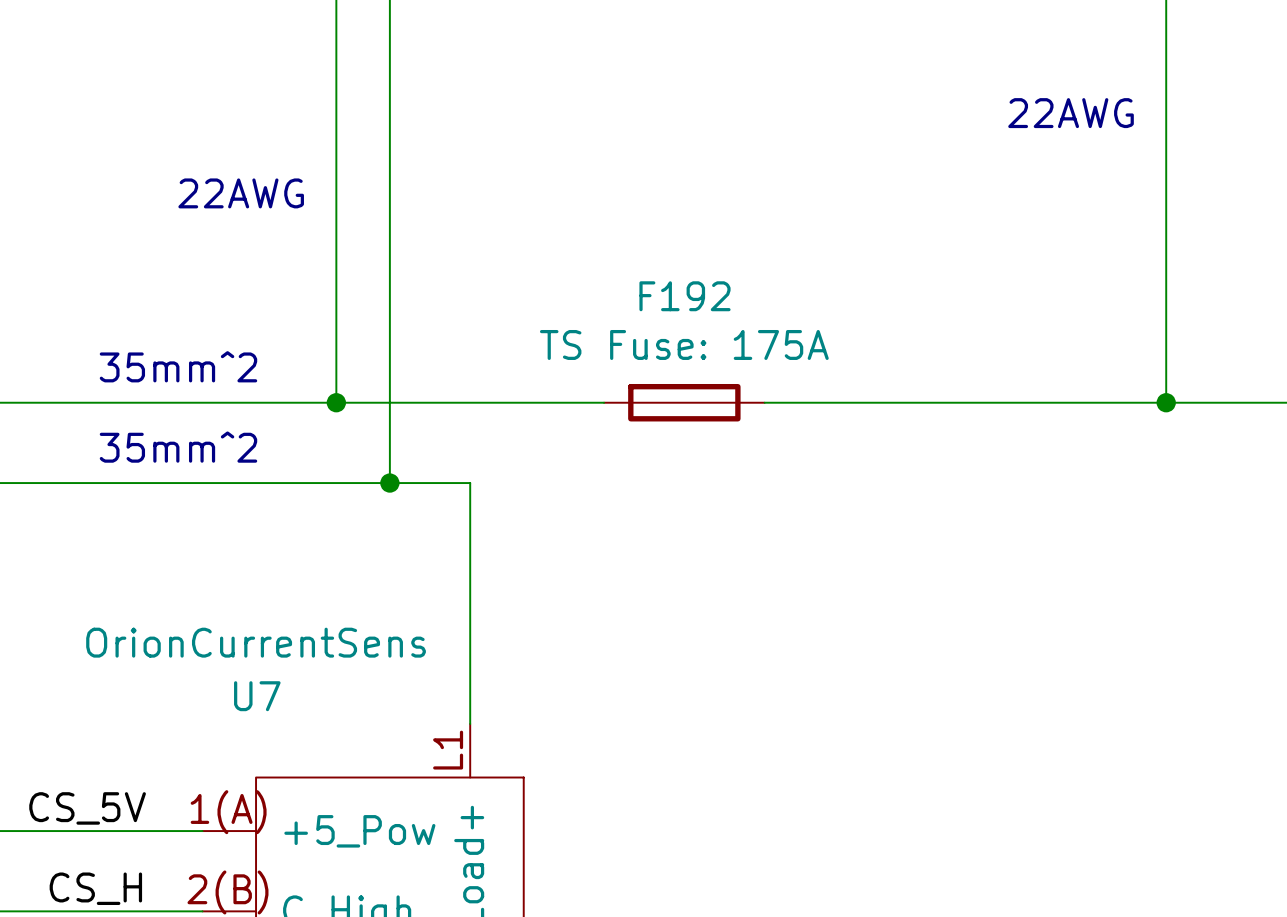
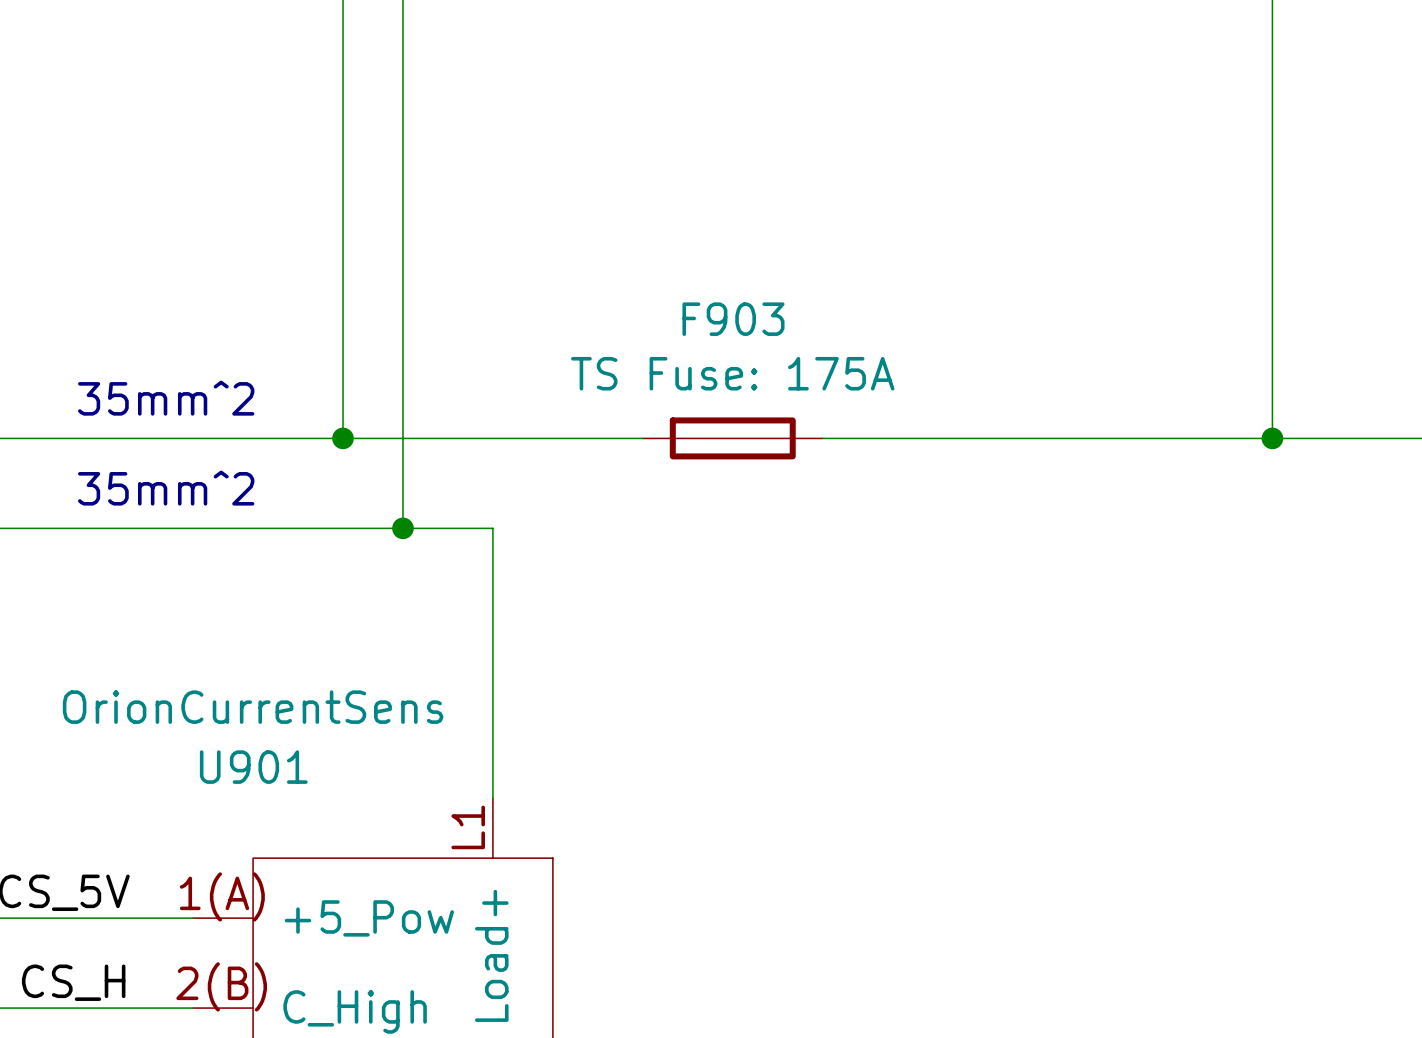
text: 22AWG (1071, 113) -> none
text: 22AWG (241, 193) -> none
F192 name: F192 (684, 296) -> F903 (733, 319)
U7 name: U7 (257, 696) -> U901 (253, 767)

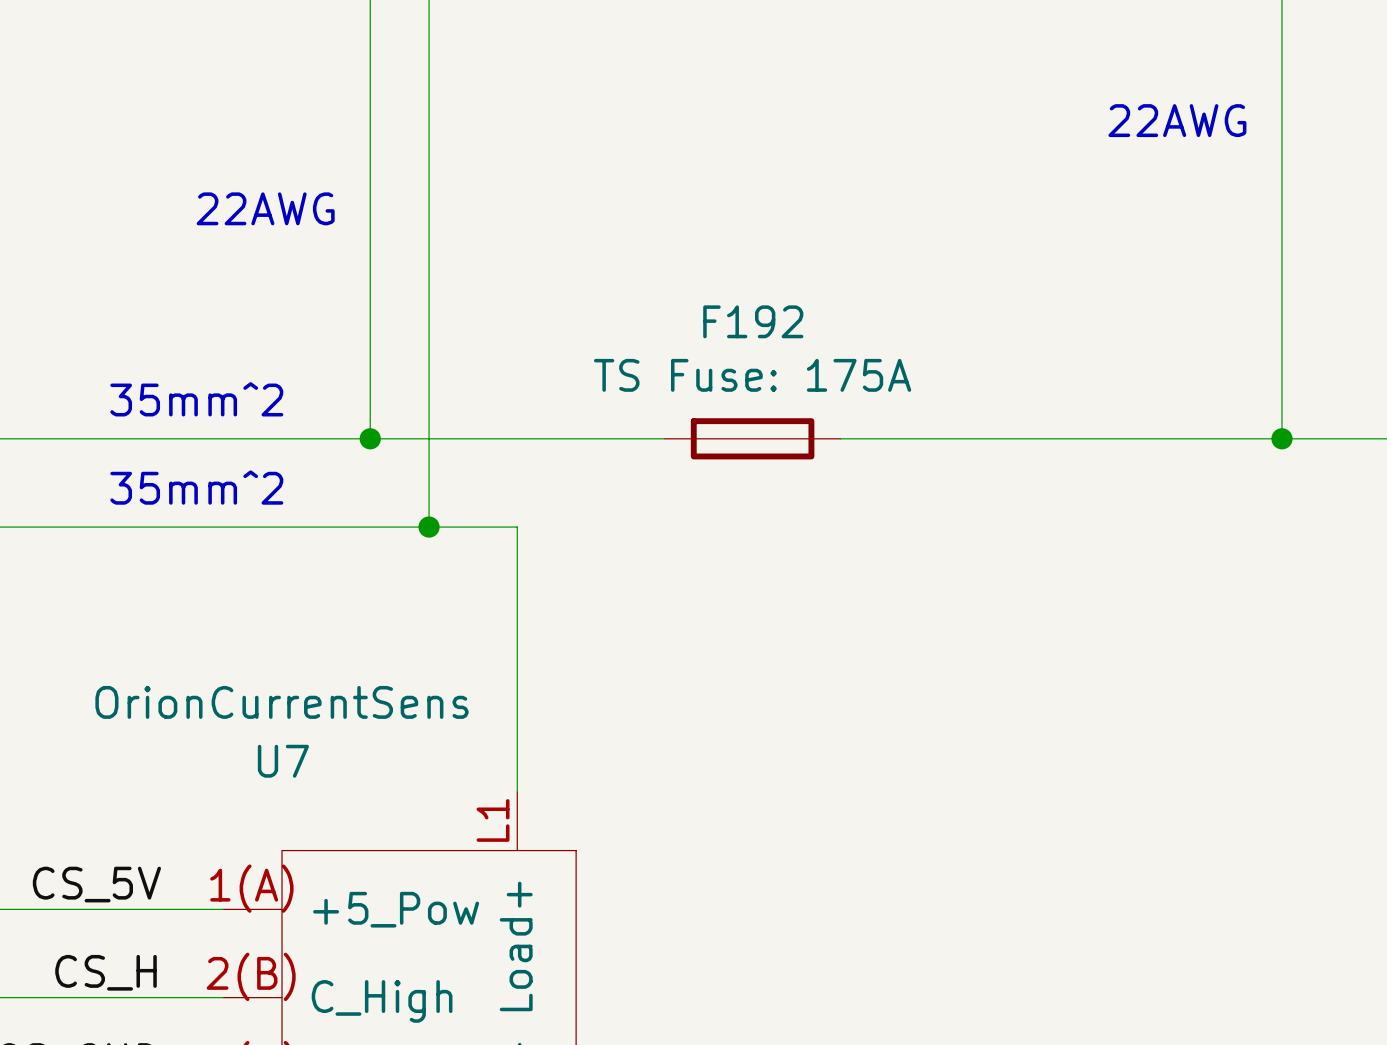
text: none -> 22AWG (1177, 120)
text: none -> 22AWG (265, 208)
F903 name: F903 (733, 319) -> F192 (753, 321)
U901 name: U901 (253, 767) -> U7 (283, 761)

